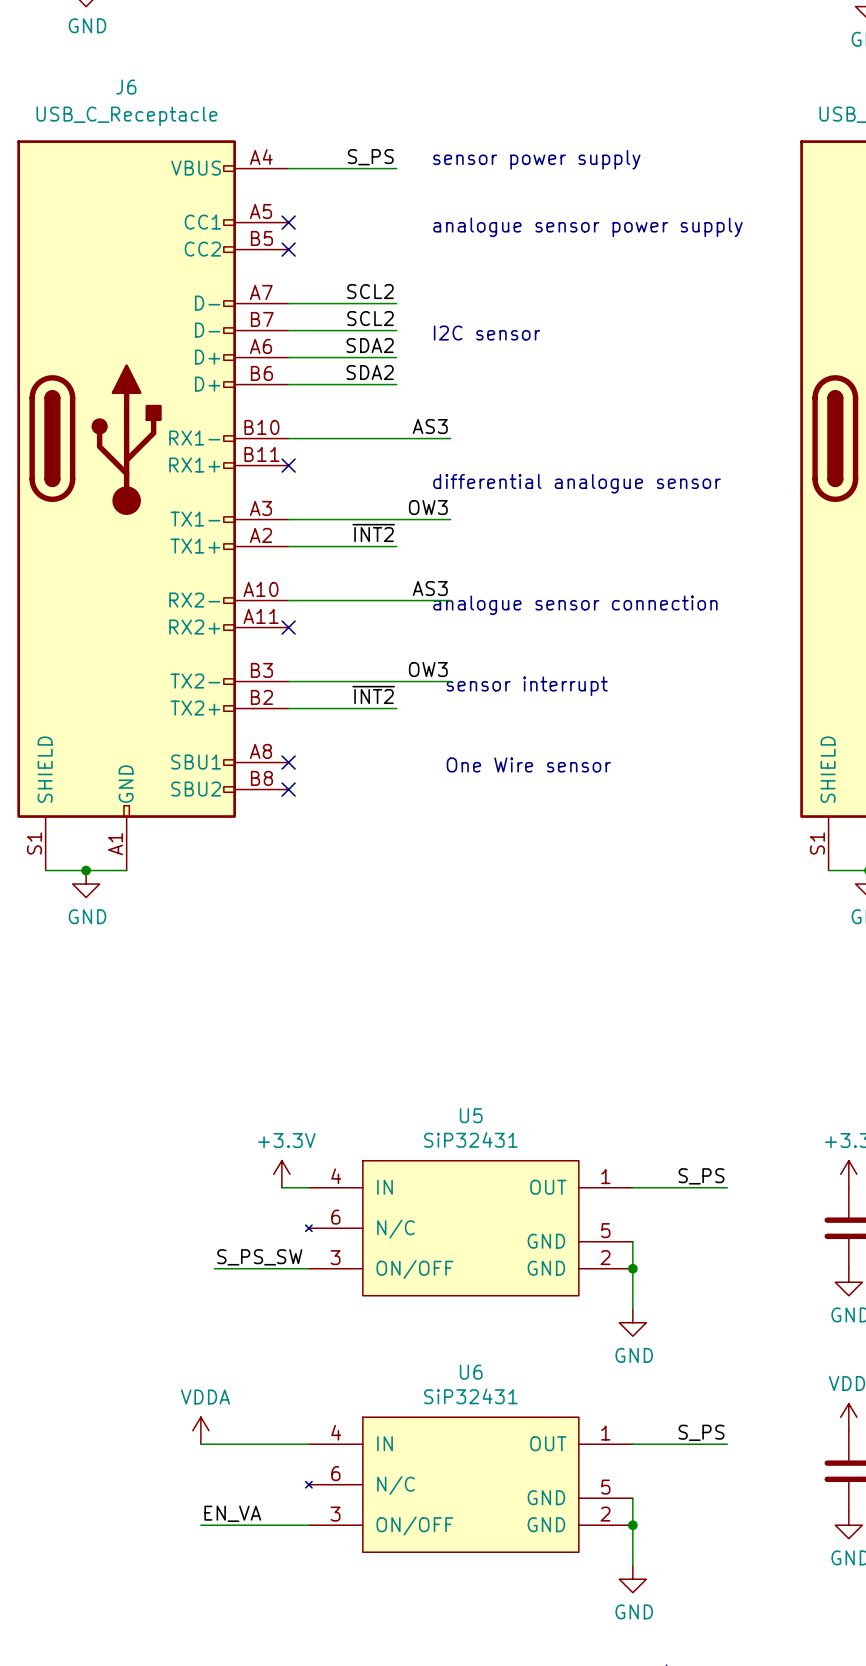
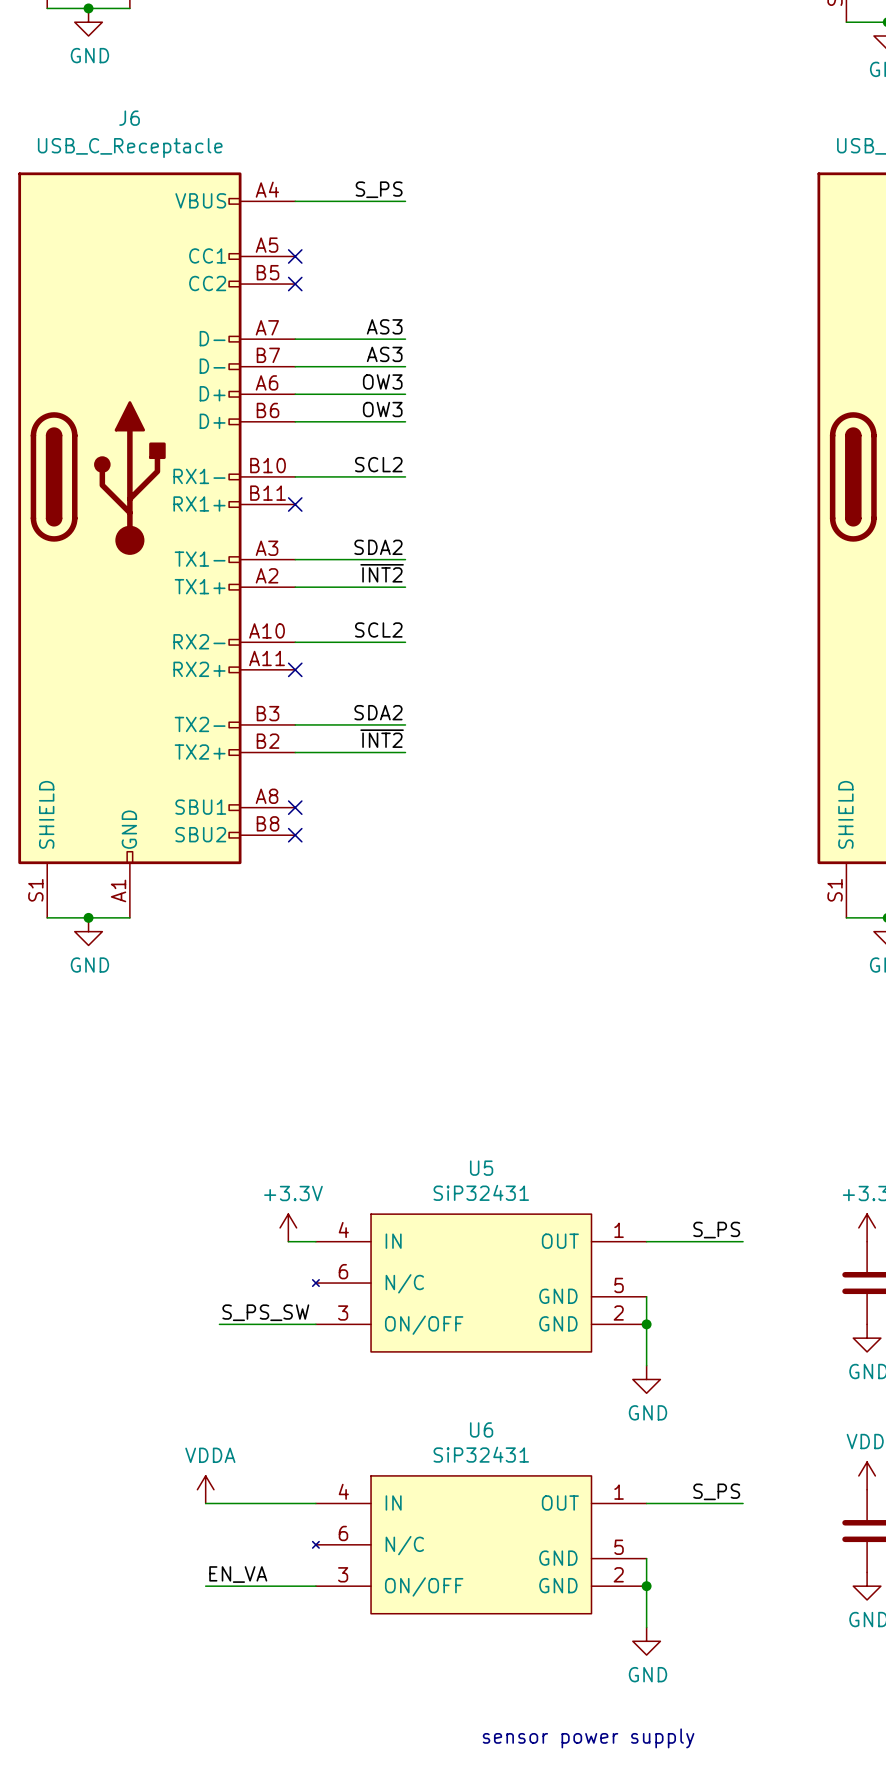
text: sensor power supply (536, 159) -> none
text: analogue sensor power supply (587, 227) -> none
label: SCL2 (370, 291) -> AS3 (384, 326)
label: SCL2 (370, 318) -> AS3 (384, 354)
text: I2C sensor (487, 333) -> none
label: SDA2 (370, 345) -> OW3 (382, 381)
label: SDA2 (370, 372) -> OW3 (382, 409)
label: none -> SCL2 (378, 464)
label: AS3 (430, 426) -> none
wire: (396, 438) (450, 438) -> none
text: differential analogue sensor (577, 483) -> none
label: none -> SDA2 (378, 547)
label: OW3 (428, 507) -> none
wire: (396, 519) (450, 519) -> none
label: none -> SCL2 (378, 629)
label: AS3 (430, 588) -> none
wire: (396, 600) (450, 600) -> none
text: analogue sensor connection (575, 605) -> none
label: none -> SDA2 (378, 712)
label: OW3 (428, 669) -> none
wire: (396, 681) (450, 681) -> none
text: sensor interrupt (527, 686) -> none
text: One Wire sensor (528, 764) -> none

